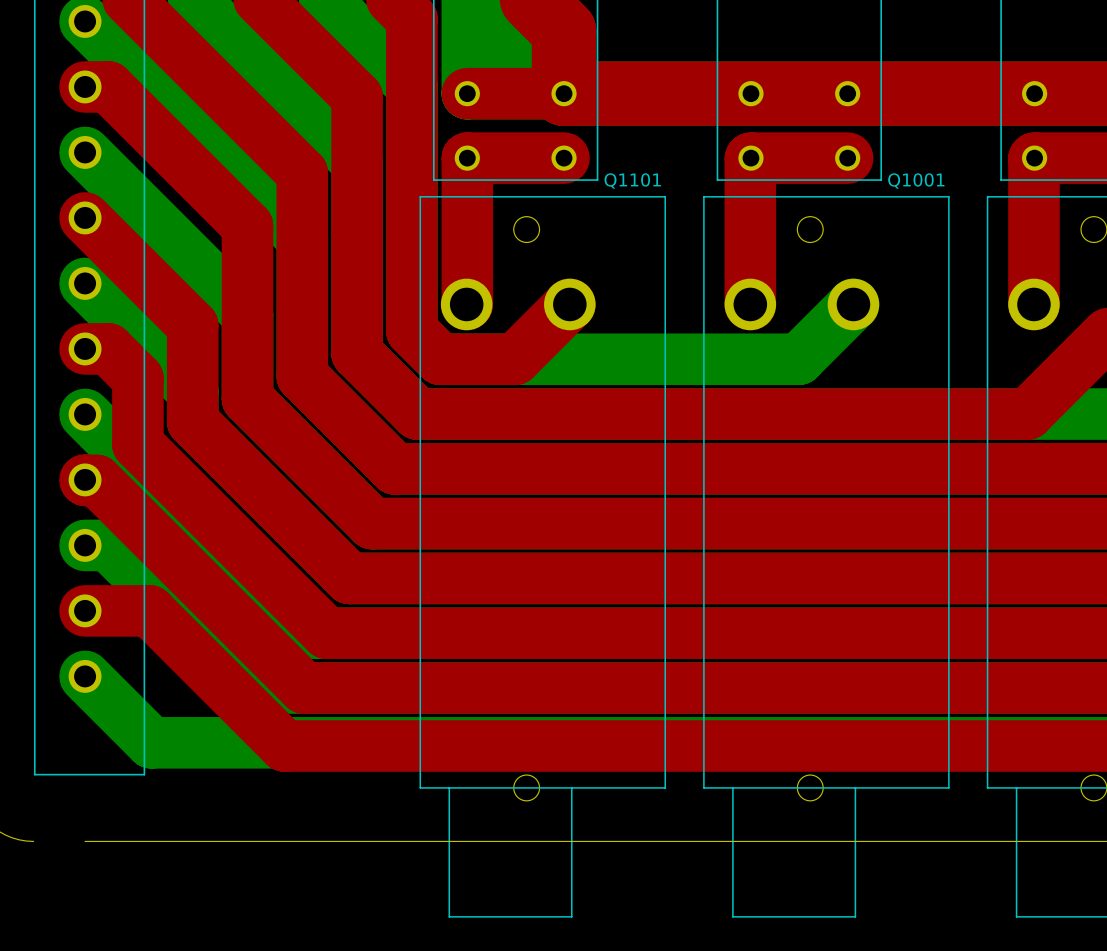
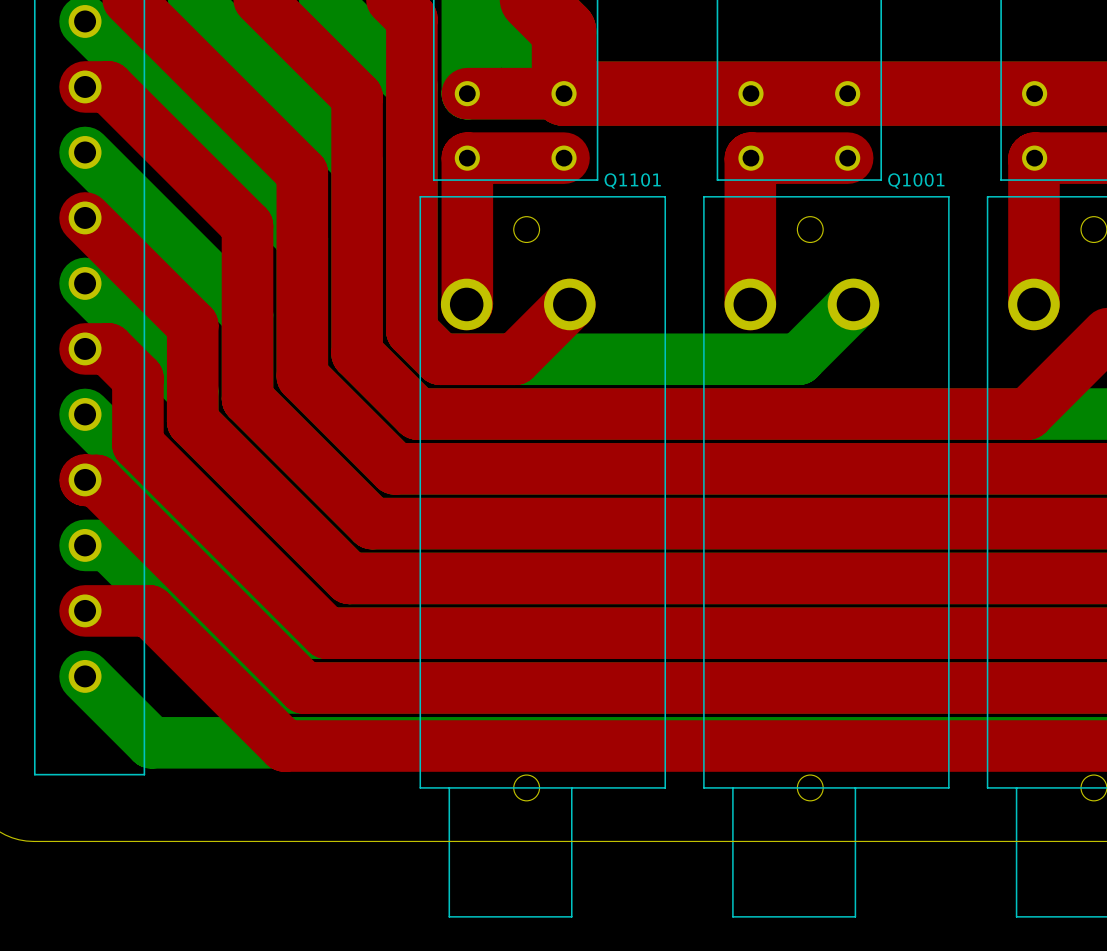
board edge: none -> (33, 841) (85, 841)

